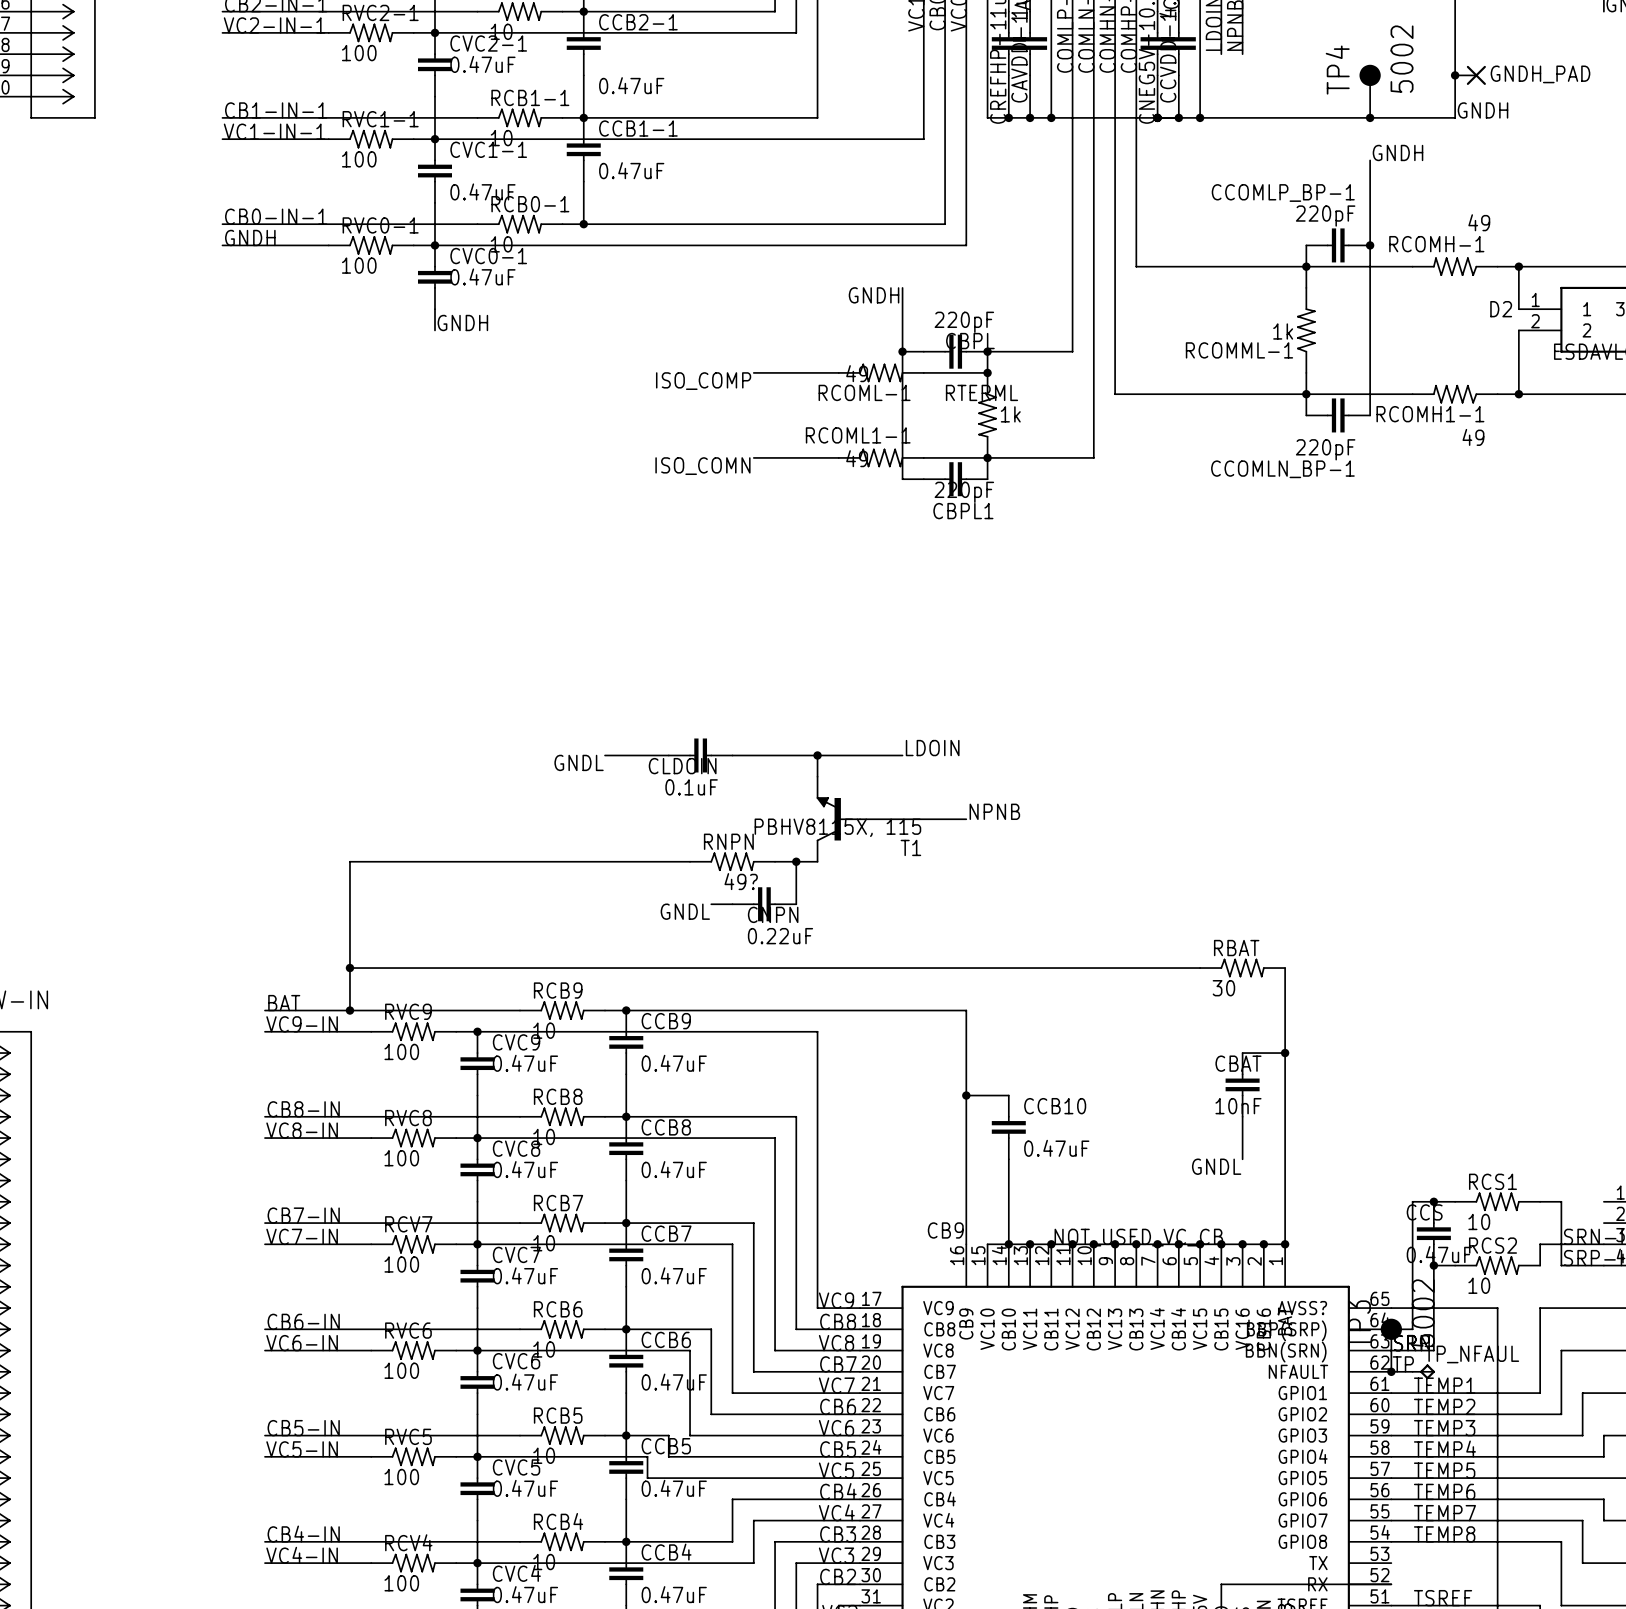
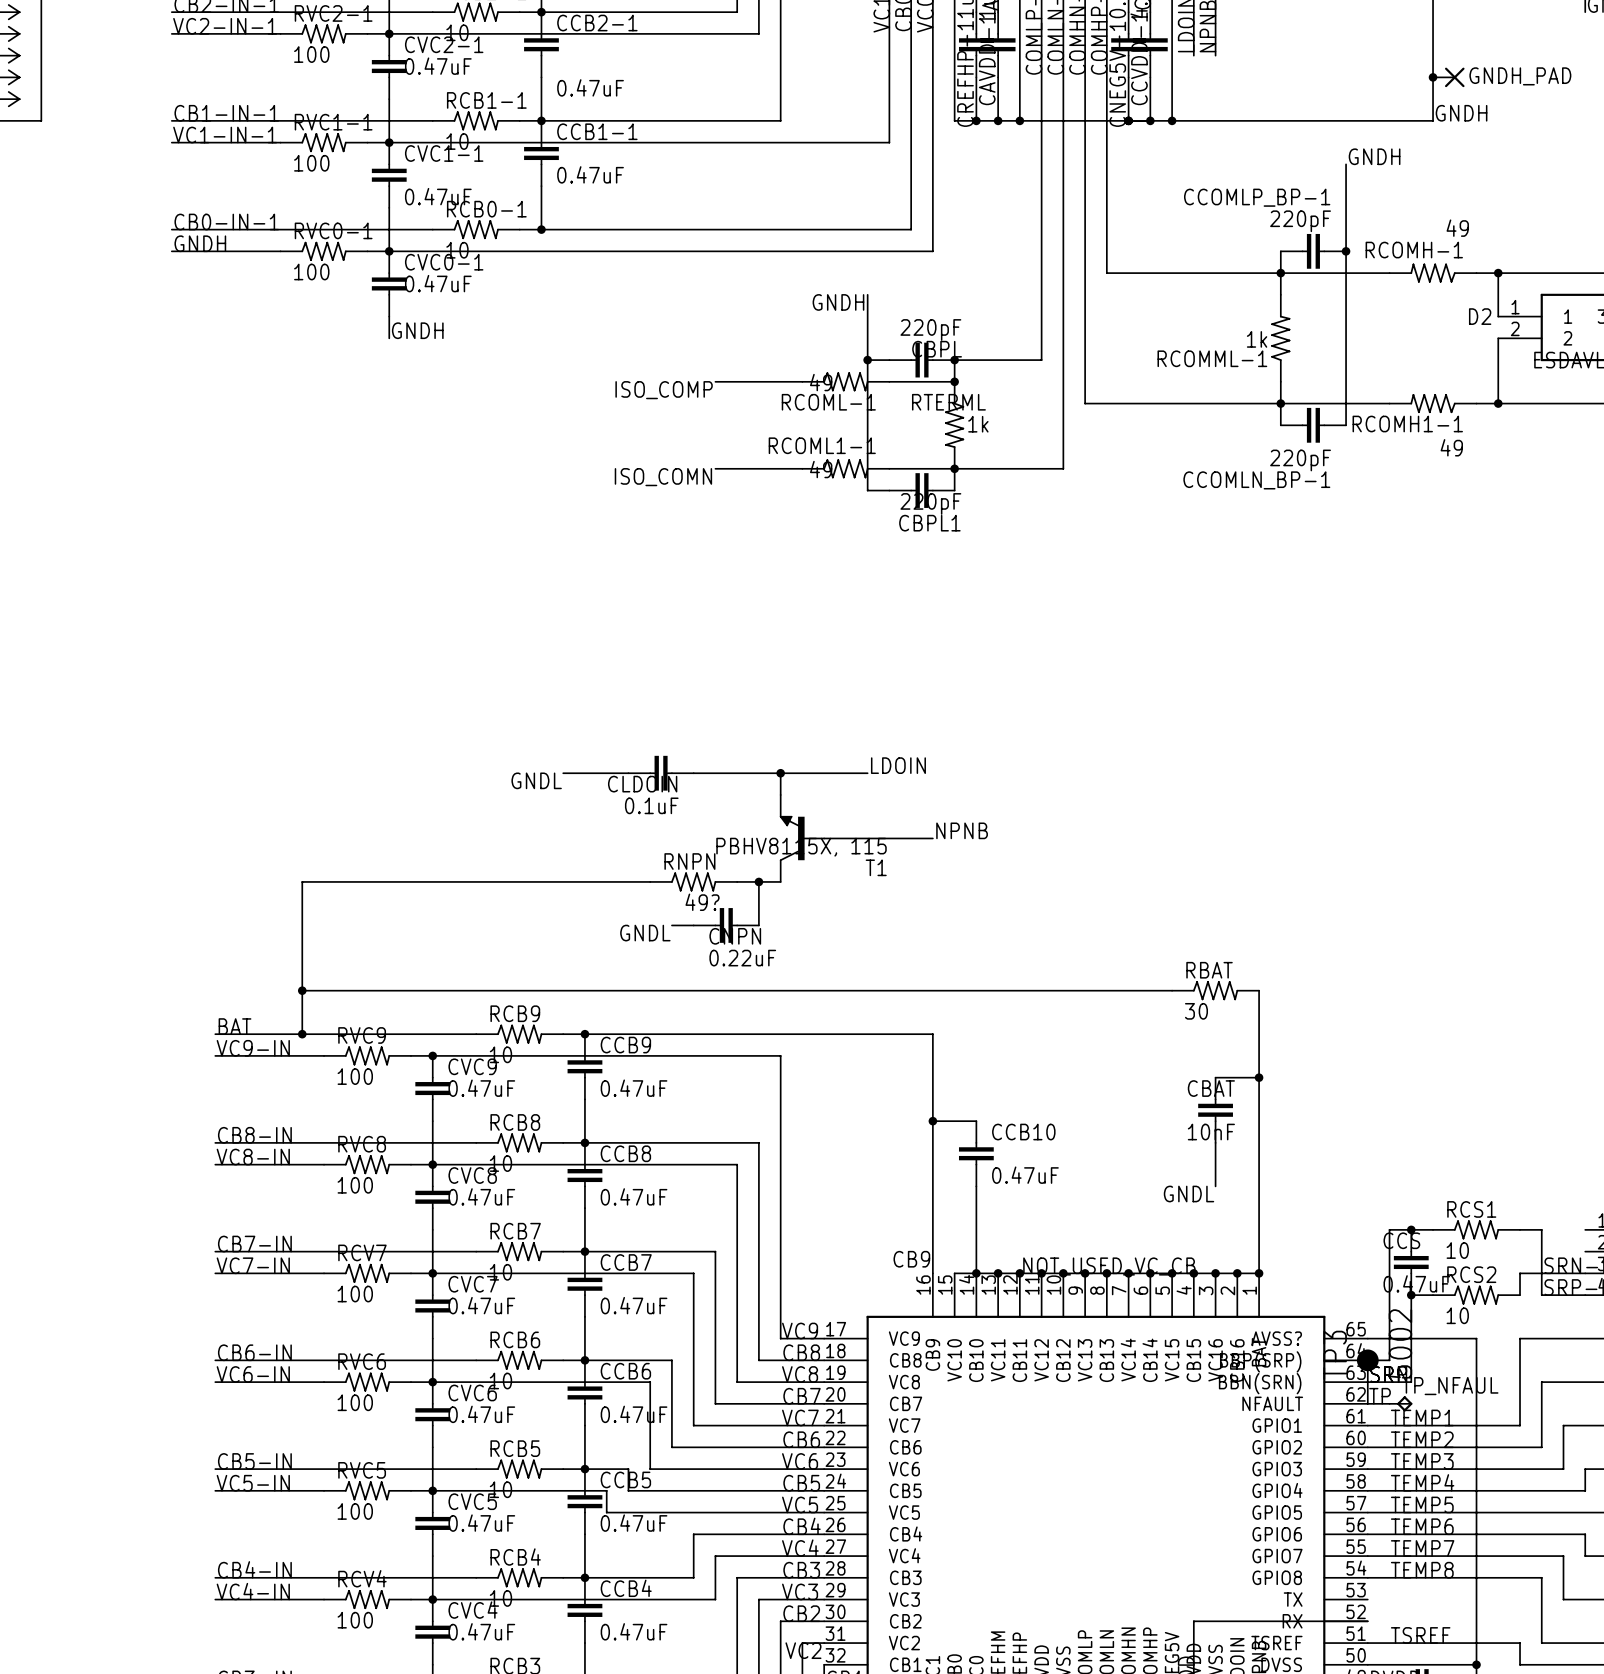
TP4: 5002 (1370, 91) -> none
junction: (1370, 117) -> none
junction: (1391, 1371) -> none

